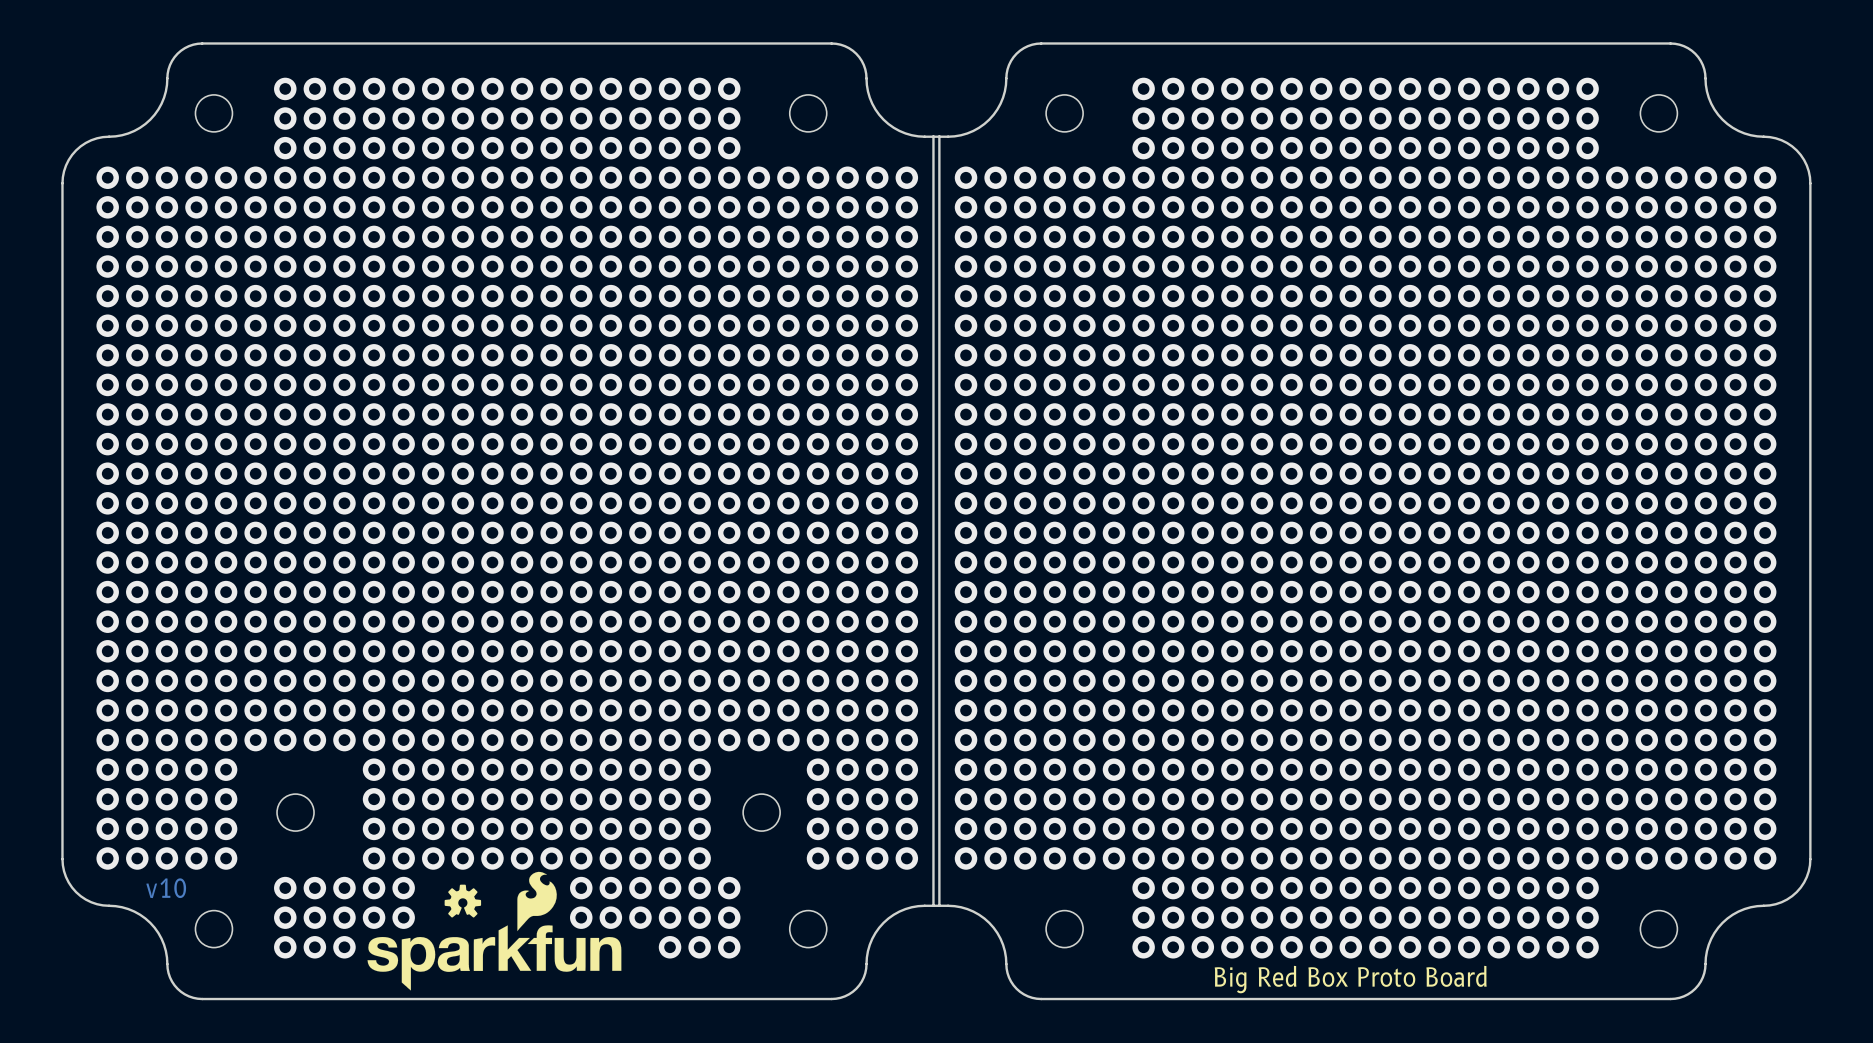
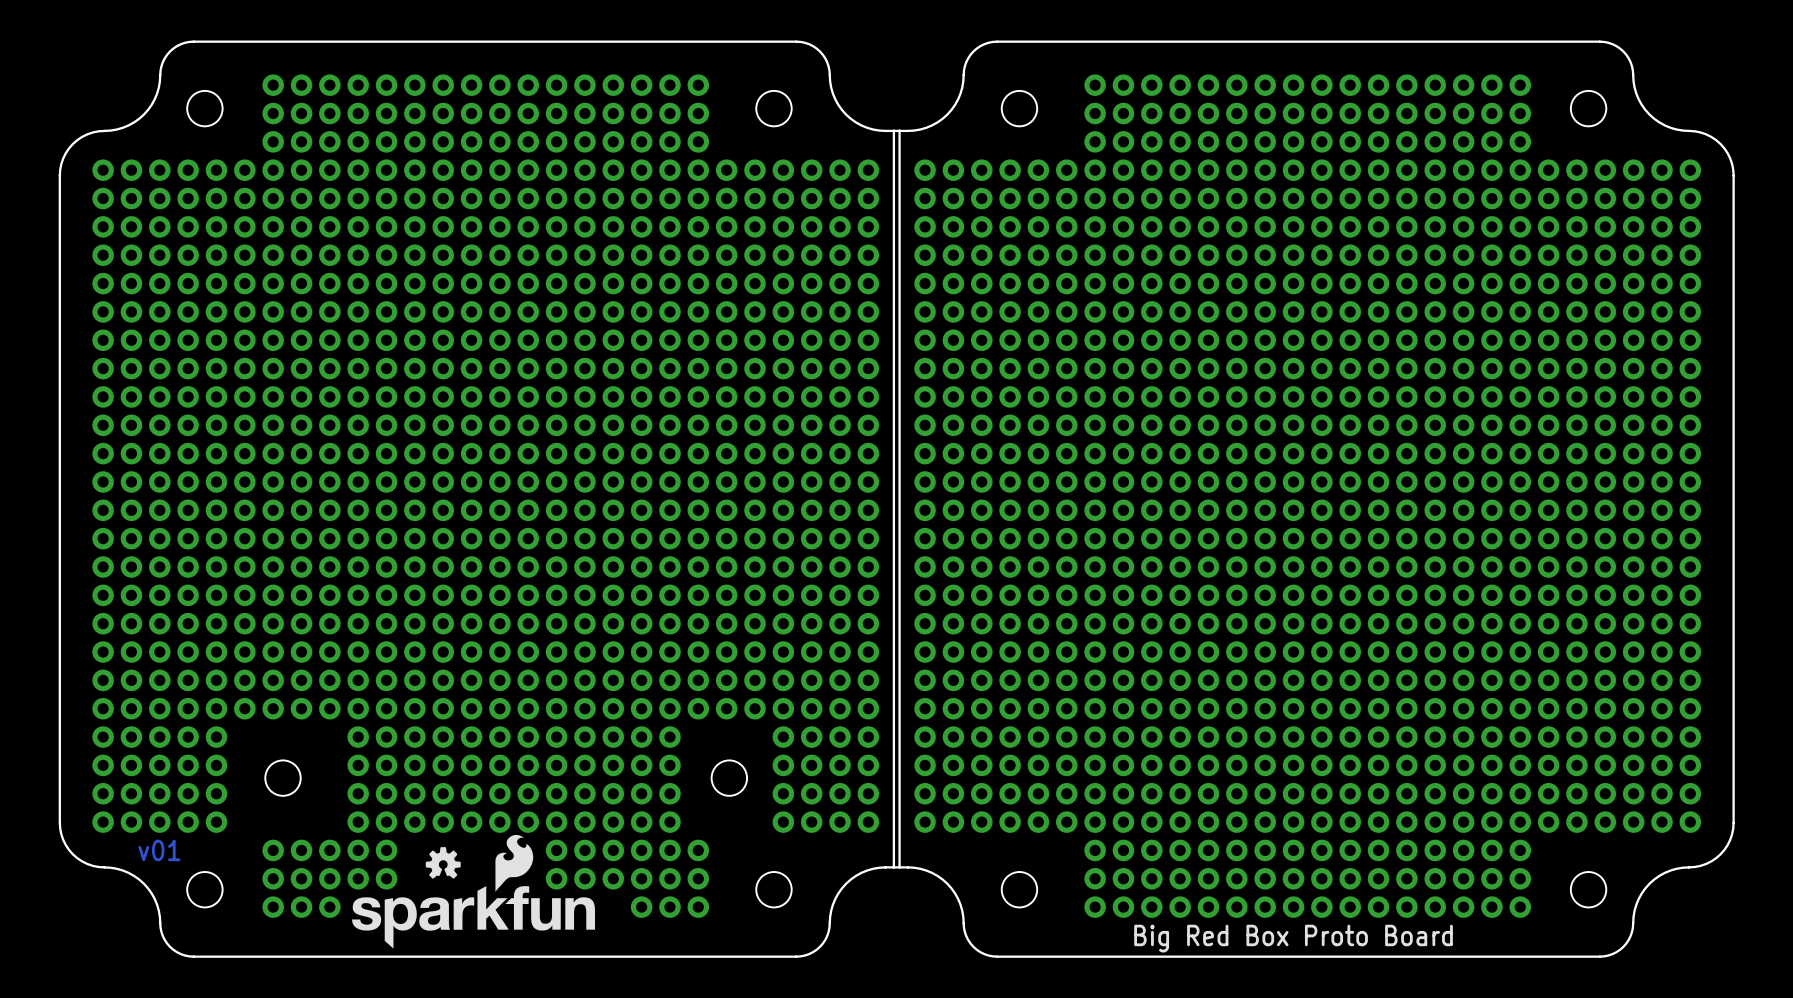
text: v10 (166, 888) -> v01 (159, 850)

